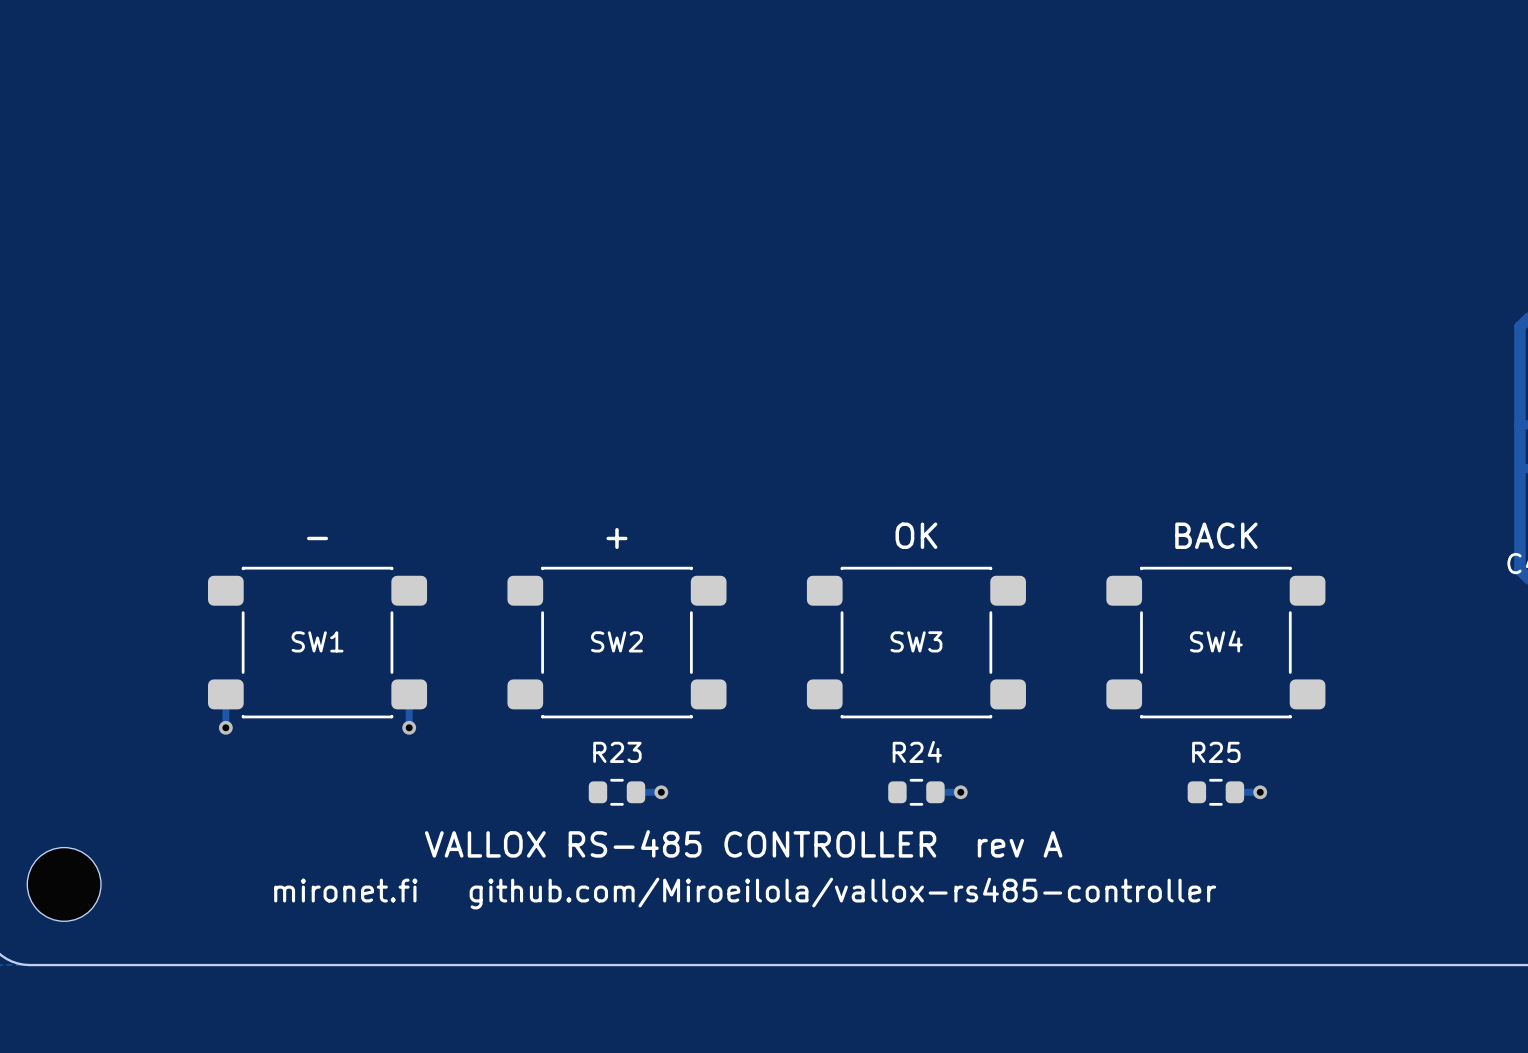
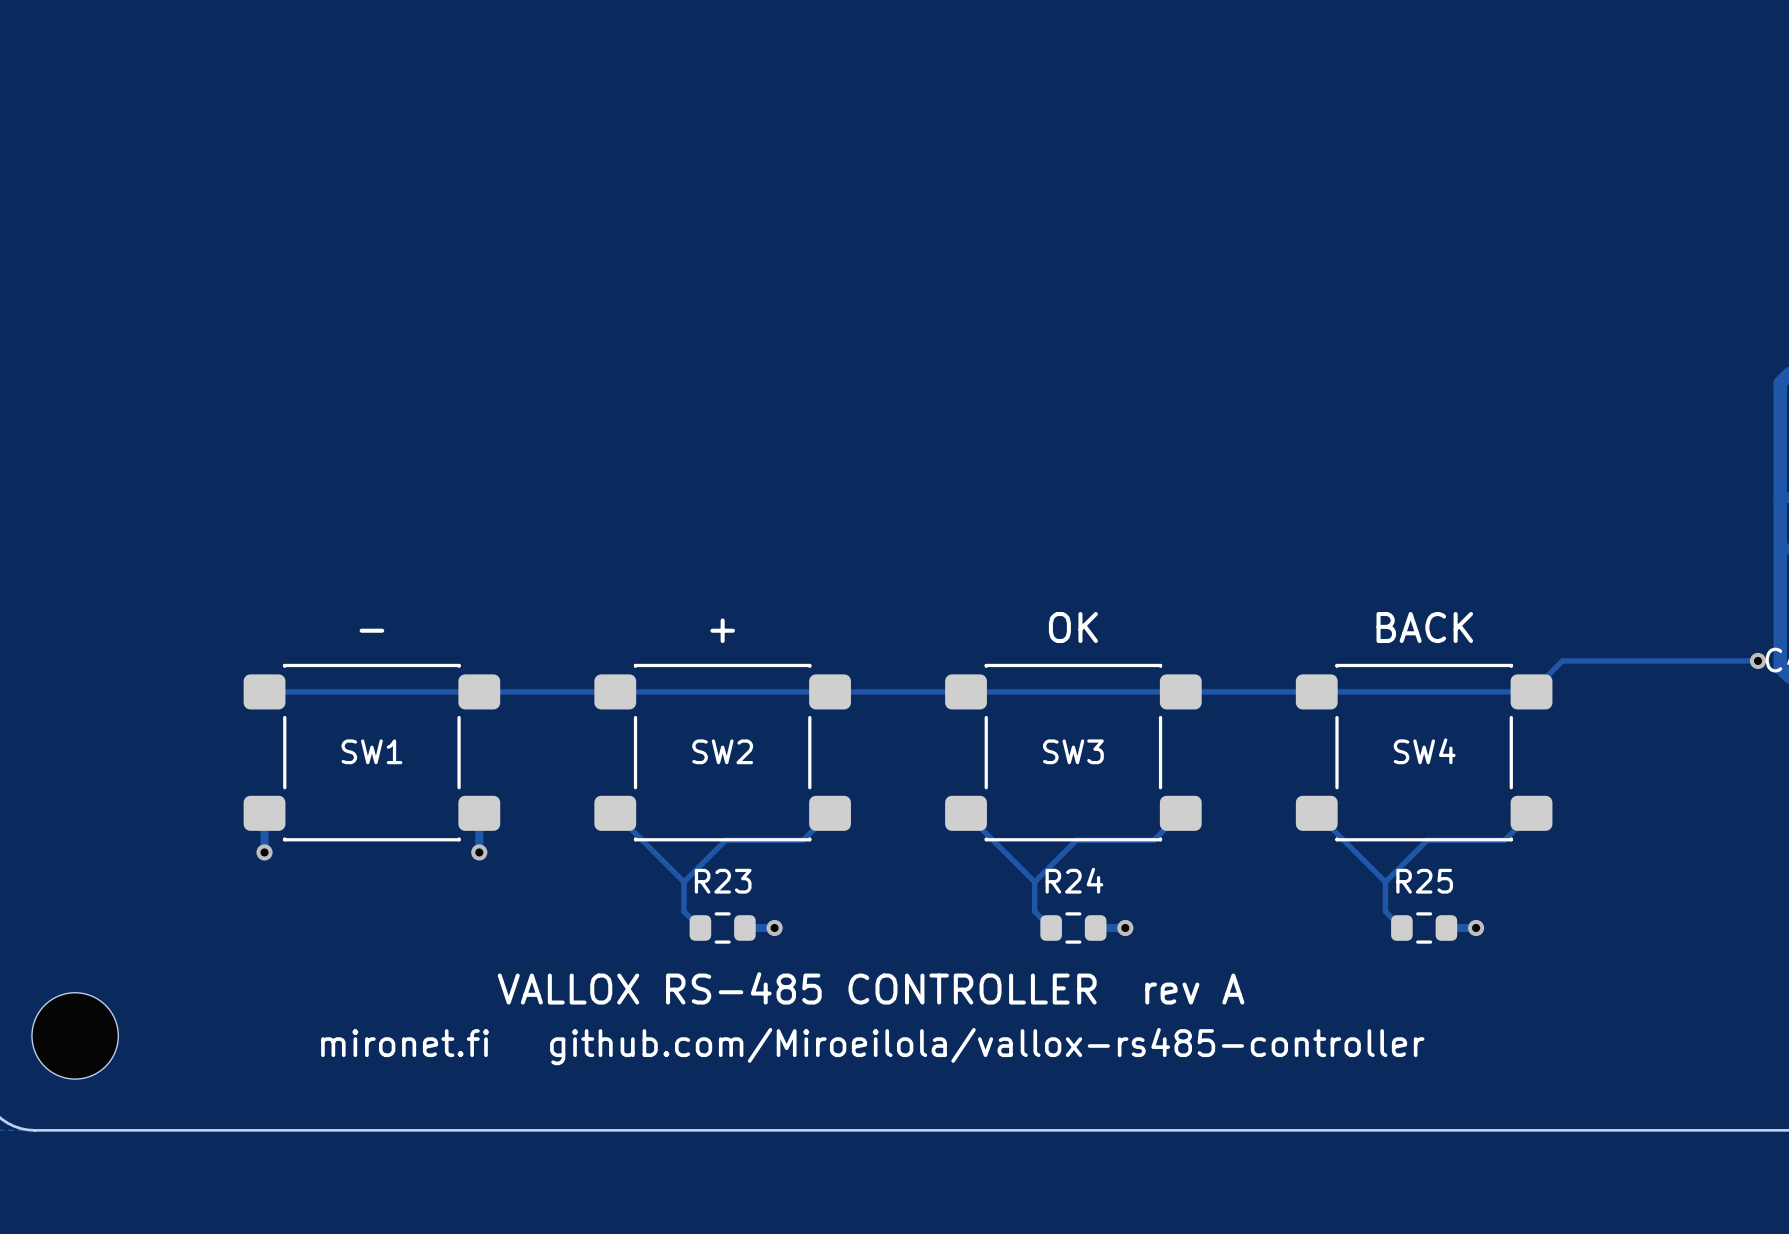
track: none -> (1758, 660) (1562, 660) (1531, 691) (264, 691)
via: none -> (1758, 660)
track: none -> (615, 813) (683, 882)
track: none -> (830, 813) (803, 840) (725, 840) (683, 882)
track: none -> (966, 813) (1034, 882)
track: none -> (1180, 813) (1153, 840) (1076, 840) (1034, 882)
track: none -> (1316, 813) (1385, 882)
track: none -> (1531, 813) (1504, 840) (1427, 840) (1385, 882)
track: none -> (683, 882) (683, 911) (700, 927)
track: none -> (1034, 882) (1034, 911) (1051, 927)
track: none -> (1385, 882) (1385, 911) (1401, 927)

